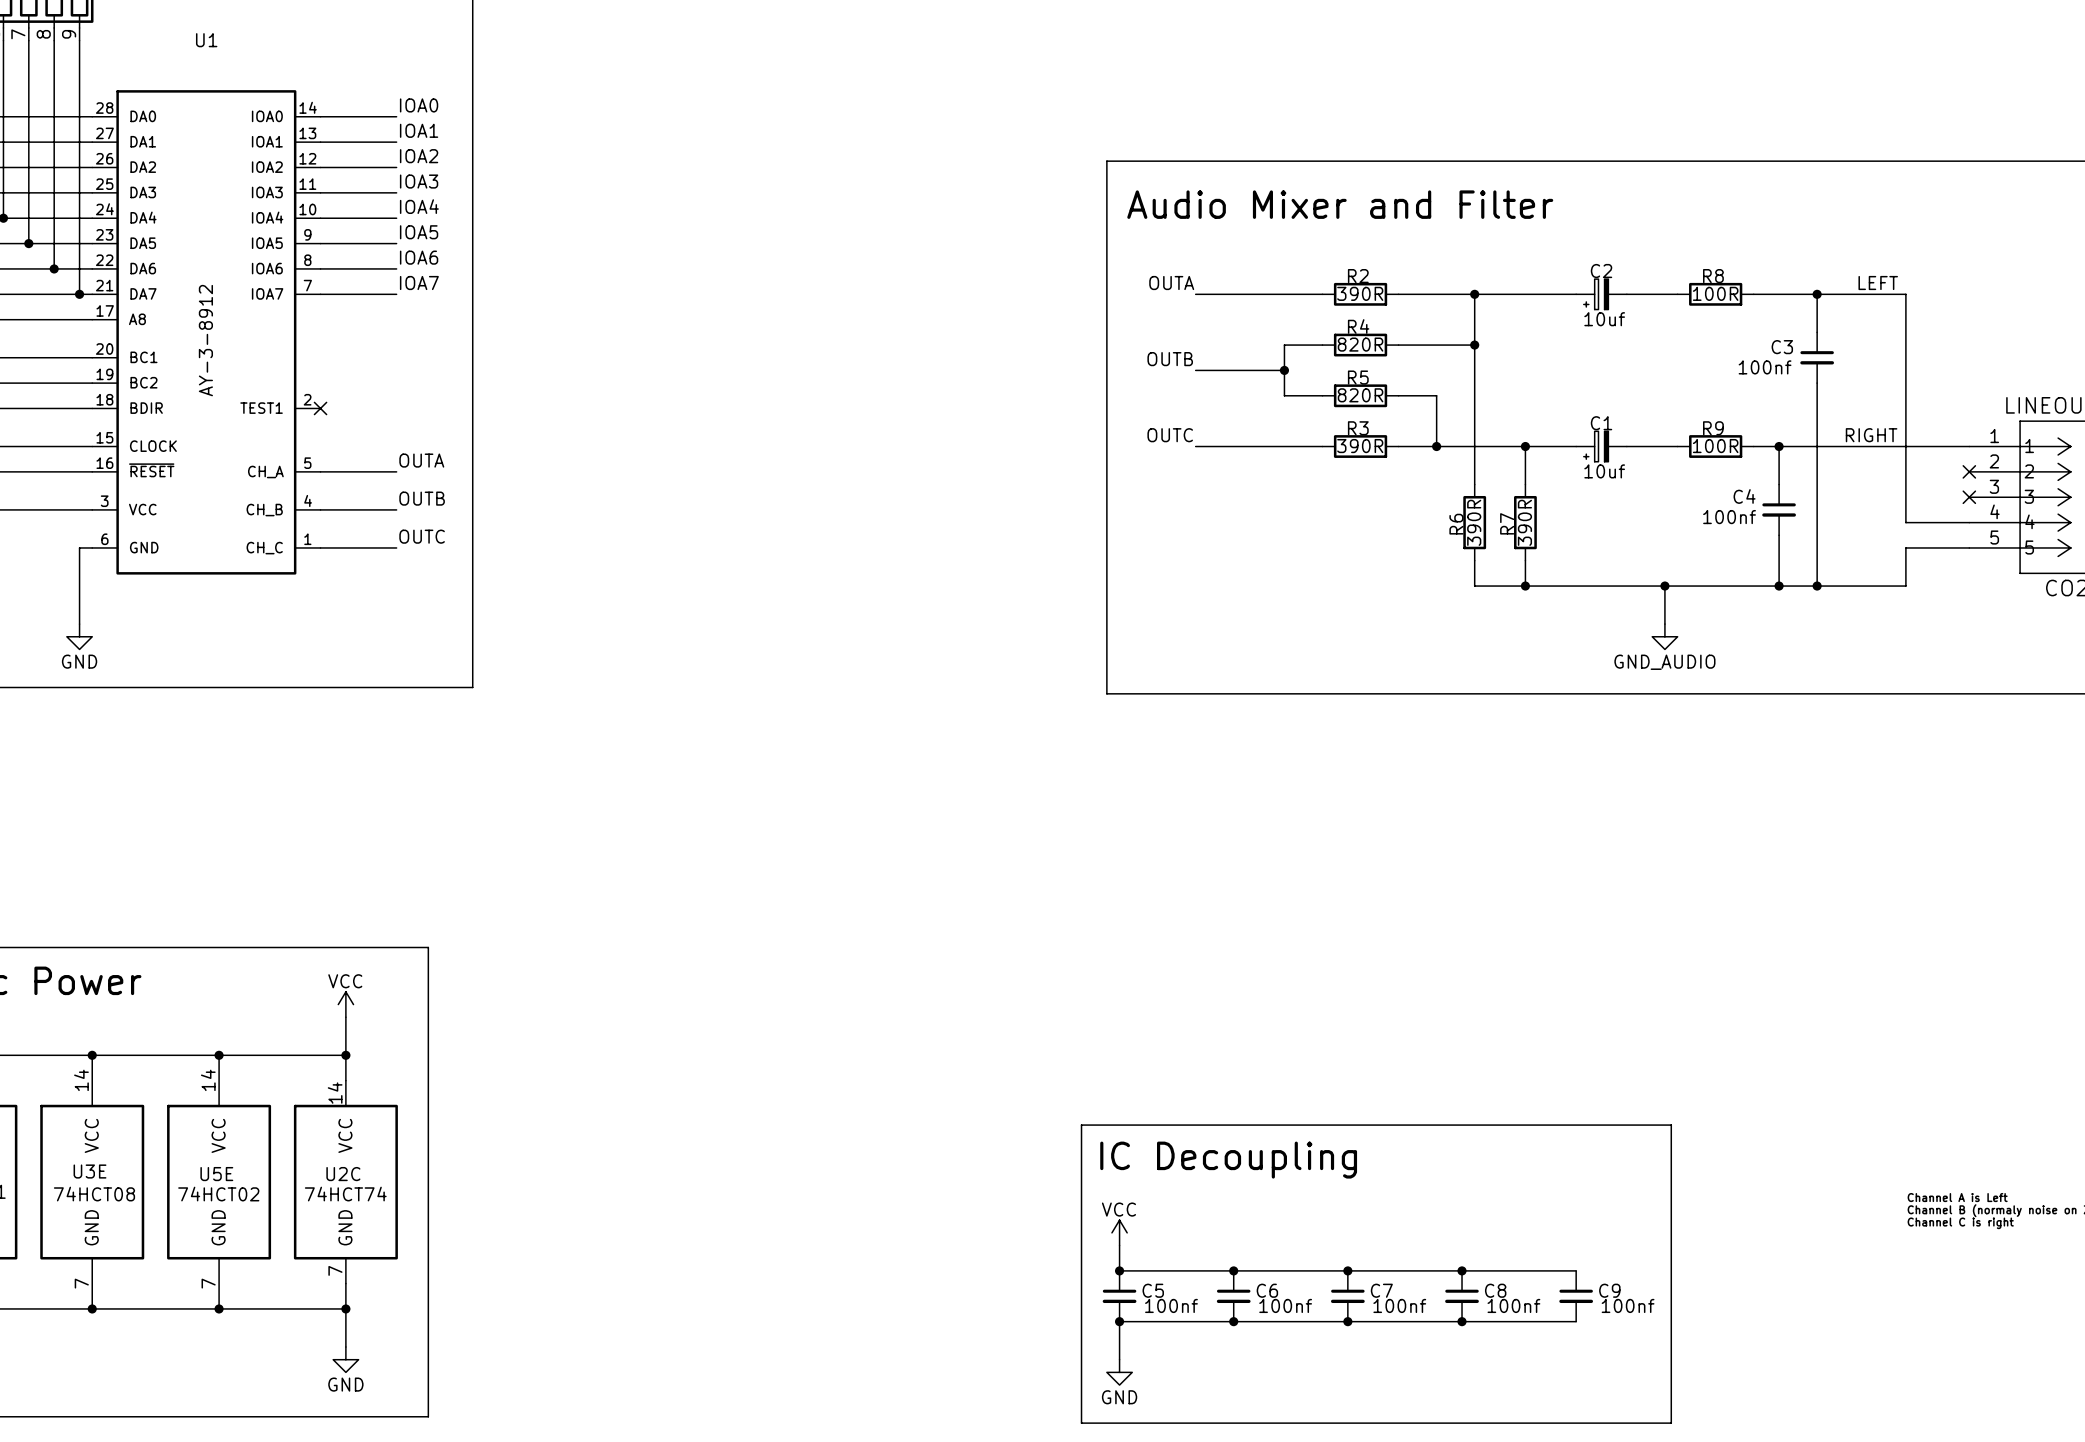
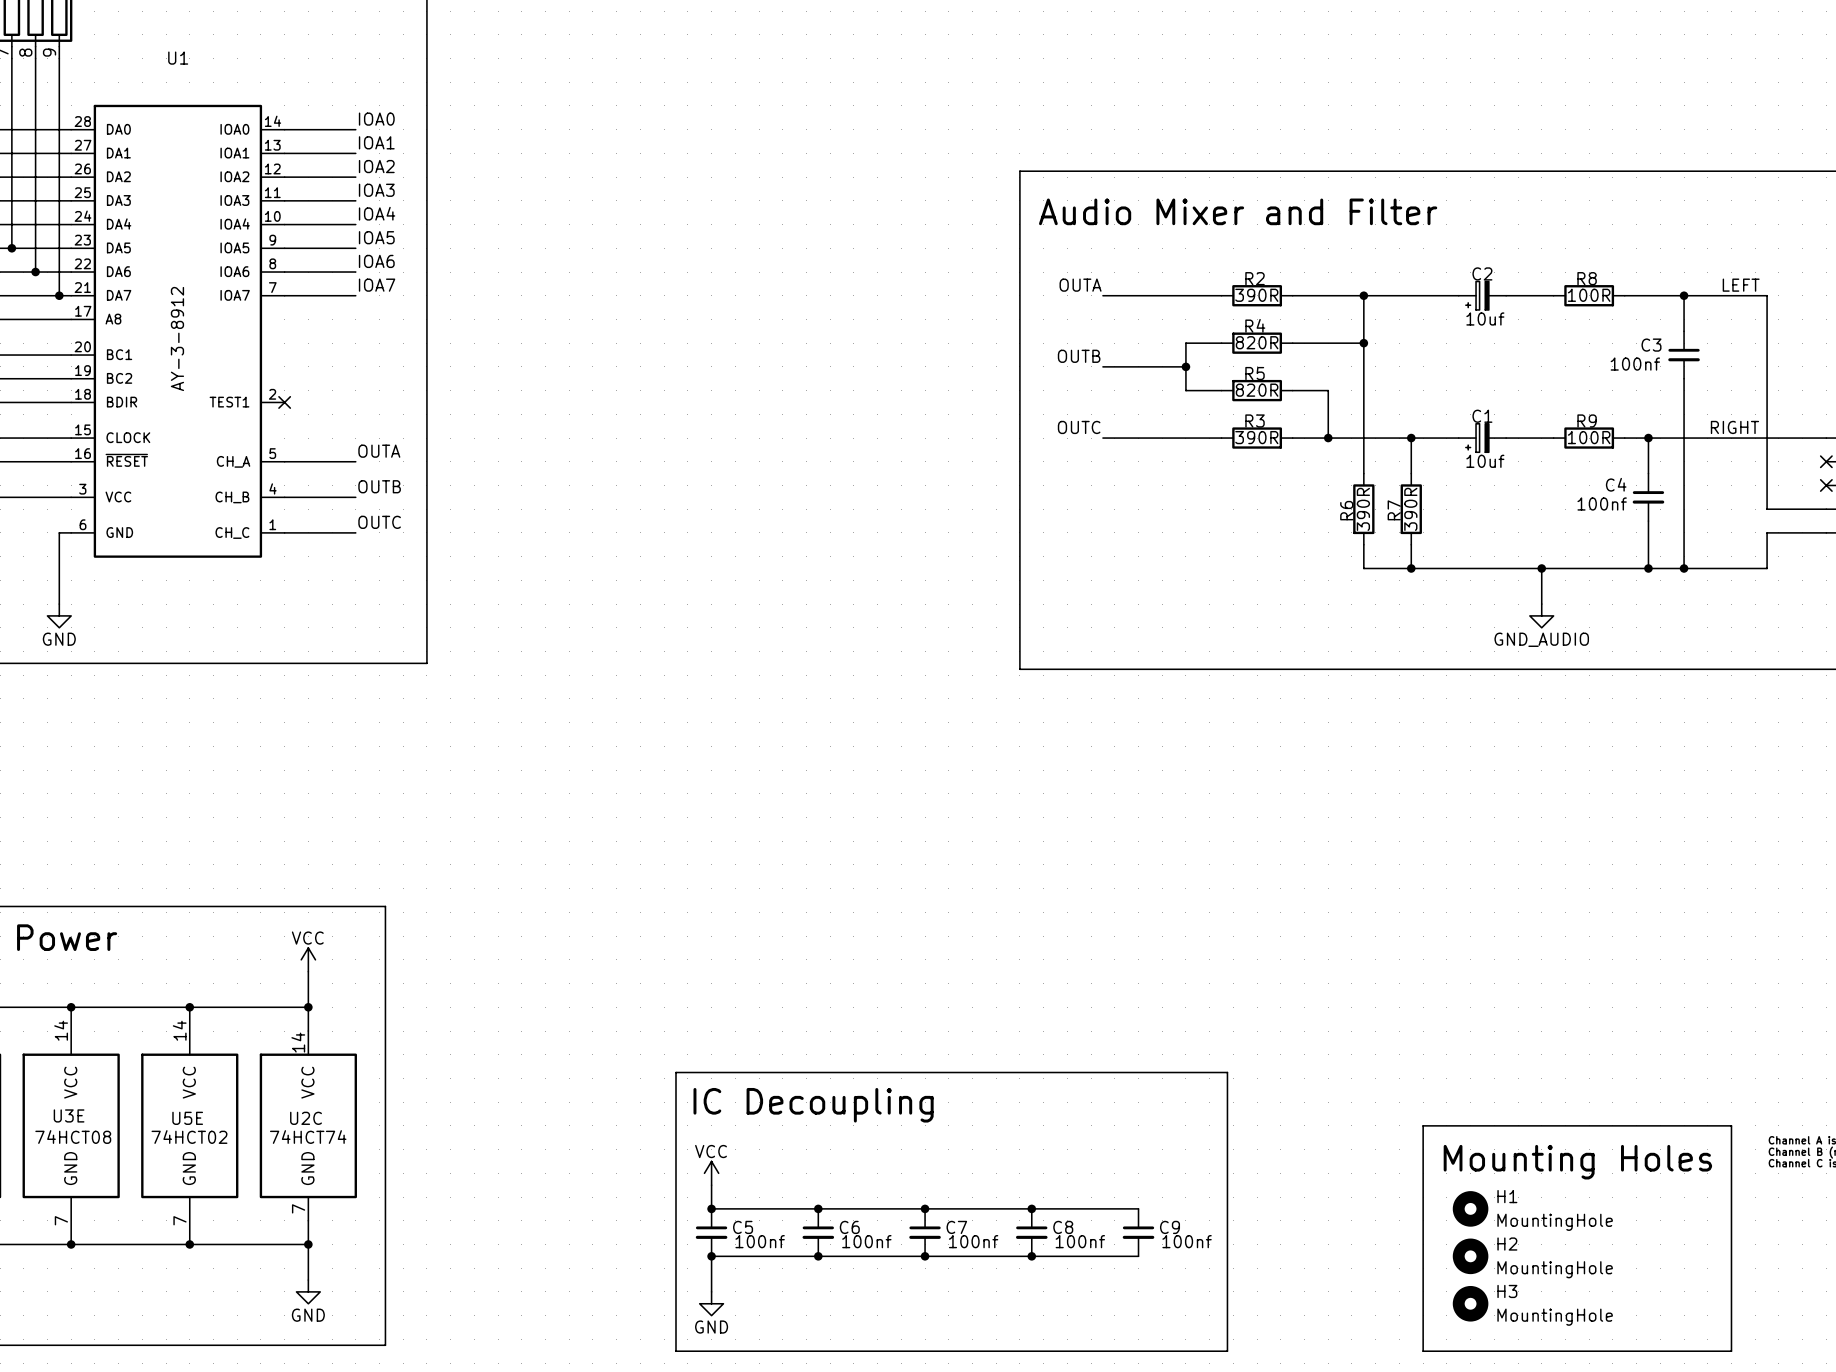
line: (1081, 1125) (1081, 1423) -> (996, 1072) (675, 1072) (675, 1351) (996, 1351)
line: (1328, 1125) (1671, 1125) (1671, 1423) -> (1227, 1072) (1227, 1351)
text: none -> IC Decoupling (813, 1105)
text: IC Decoupling (1228, 1160) -> none
text: none -> Mounting Holes (1577, 1162)
power symbol: none -> VCC (711, 1173)
power symbol: VCC (1119, 1232) -> none
wire: (1119, 1245) (1119, 1270) -> (711, 1185) (711, 1208) (1031, 1208)
junction: none -> (711, 1208)
junction: none -> (818, 1208)
junction: none -> (925, 1208)
wire: (1233, 1270) (1576, 1270) -> none
junction: (1233, 1270) -> none
junction: (1347, 1270) -> none
junction: (1462, 1270) -> none
H1: none -> MountingHole (1470, 1208)
C5 name: C5 (1153, 1290) -> C8 (1063, 1227)
C6 name: C6 (1267, 1290) -> C9 (1170, 1227)
C5: none -> 100nf (711, 1232)
C6: none -> 100nf (818, 1232)
C7 position: (1347, 1296) -> (925, 1232)
C8: 100nf (1462, 1296) -> none
C9: 100nf (1576, 1296) -> none
junction: none -> (711, 1256)
junction: none -> (818, 1256)
junction: none -> (925, 1256)
wire: (1119, 1321) (1119, 1359) -> (1031, 1256) (711, 1256) (711, 1291)
wire: (1233, 1321) (1576, 1321) -> none
junction: (1233, 1321) -> none
junction: (1347, 1321) -> none
junction: (1462, 1321) -> none
H2: none -> MountingHole (1470, 1256)
power symbol: none -> GND (711, 1303)
power symbol: GND (1119, 1372) -> none
H3: none -> MountingHole (1470, 1303)
line: (1328, 1423) (1538, 1423) -> (1547, 1351) (1731, 1351) (1731, 1125) (1423, 1125) (1423, 1351)

